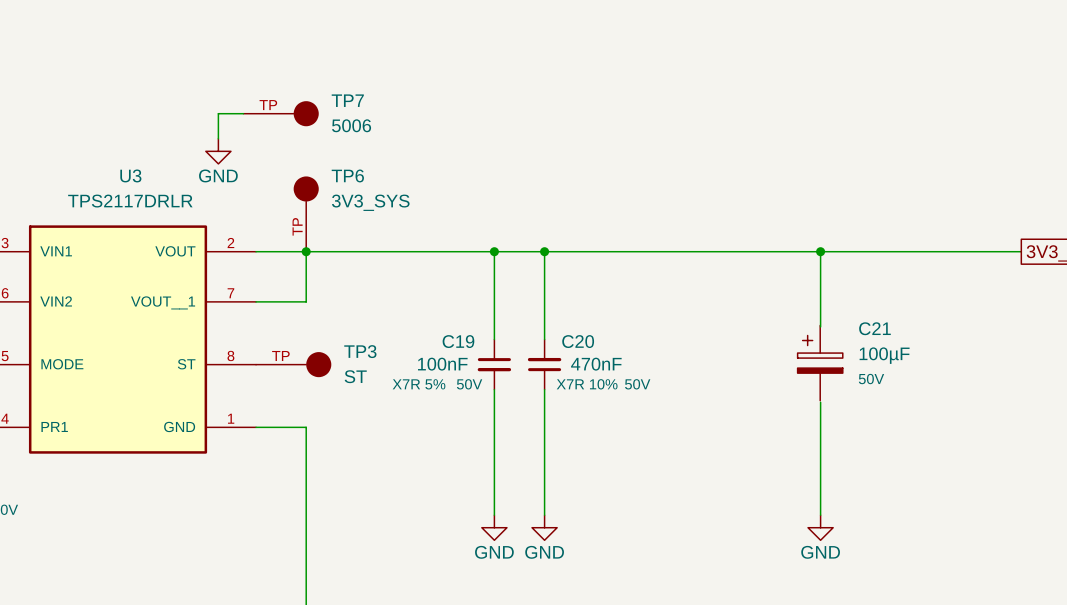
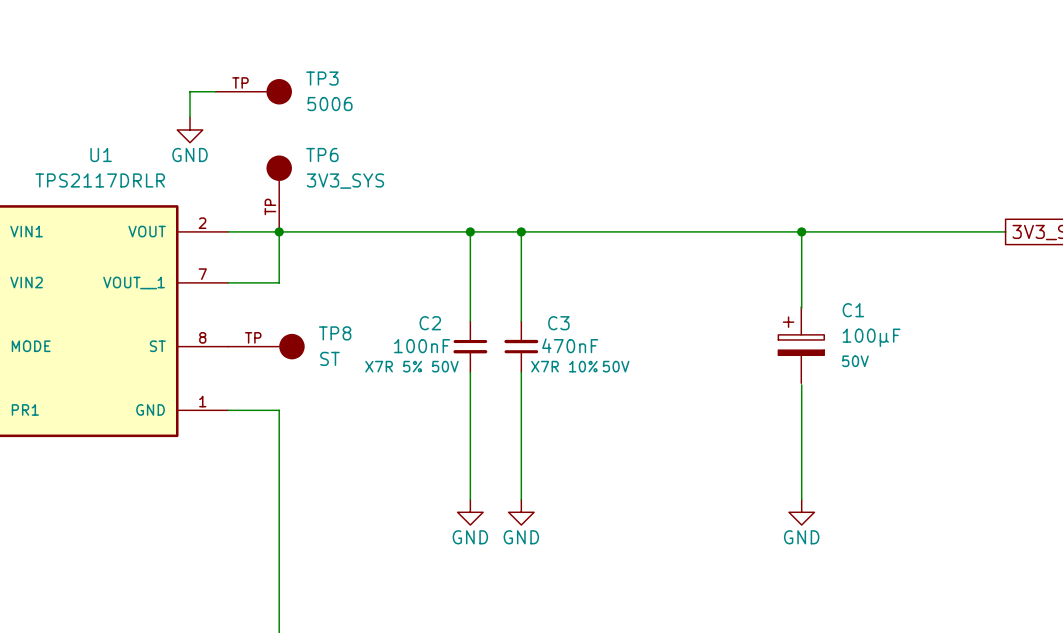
TP7 name: TP7 (347, 100) -> TP3 (322, 78)
U3 name: U3 (130, 175) -> U1 (101, 154)
C21 name: C21 (874, 328) -> C1 (853, 310)
C19 name: C19 (458, 341) -> C2 (430, 323)
C20 name: C20 (578, 341) -> C3 (558, 323)
TP3 name: TP3 (360, 351) -> TP8 (335, 333)

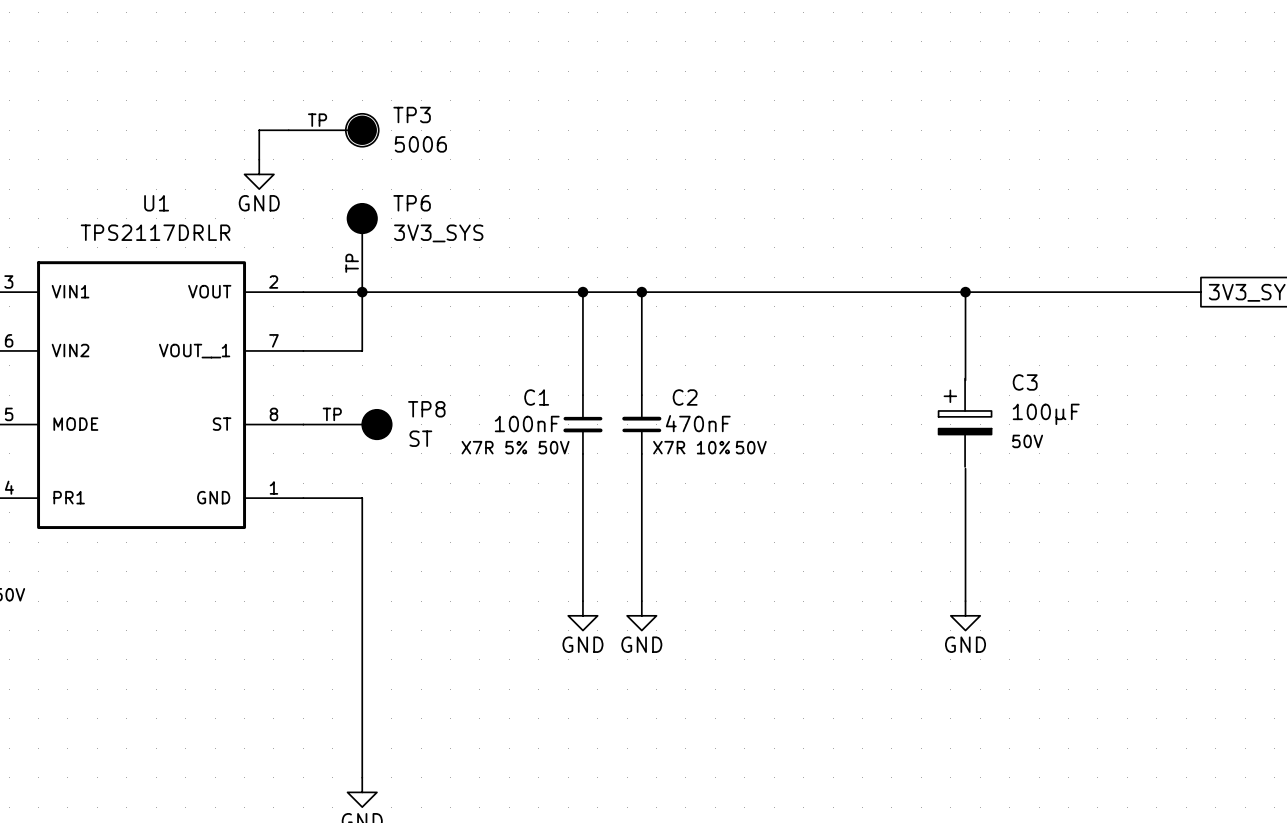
TP3 symbol: [215, 79, 292, 105] -> [288, 113, 379, 147]
TP6 symbol: [266, 155, 292, 232] -> [347, 203, 377, 293]
C1 name: C1 (853, 310) -> C3 (1025, 382)
C2 name: C2 (430, 323) -> C1 (536, 397)
C3 name: C3 (558, 323) -> C2 (685, 397)
TP8 symbol: [228, 333, 305, 360] -> [303, 409, 392, 440]

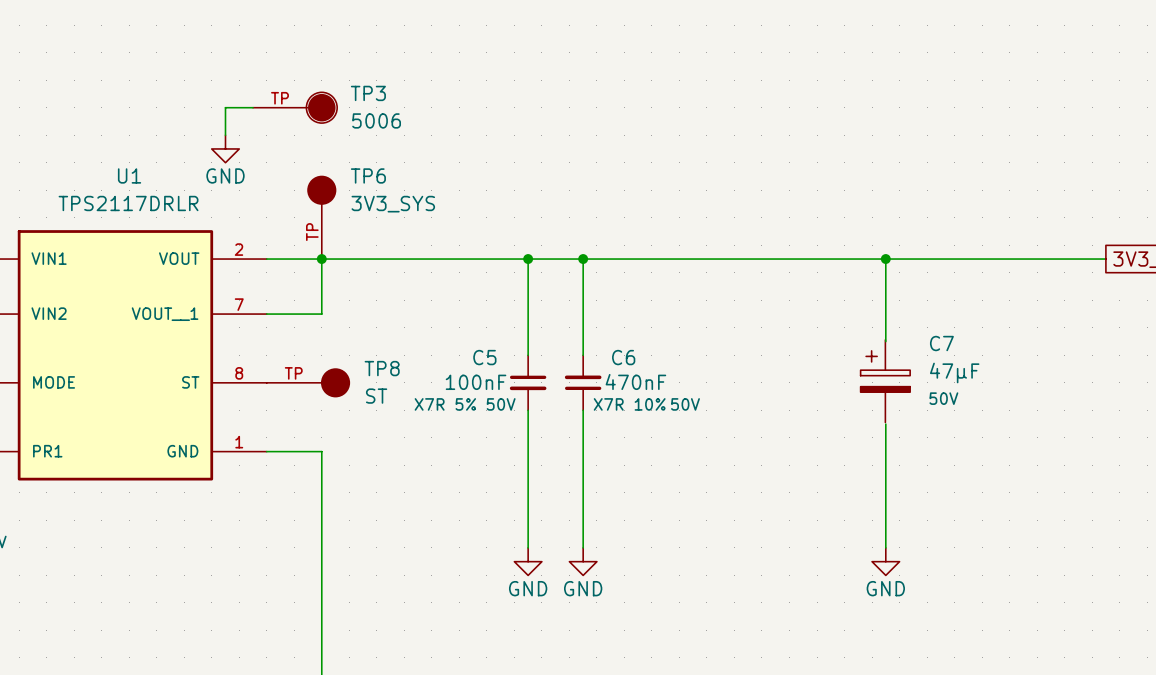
C3 name: C3 (1025, 382) -> C7 (941, 343)
C1 name: C1 (536, 397) -> C5 (484, 357)
C2 name: C2 (685, 397) -> C6 (623, 357)
C3 value: 100µF (1046, 414) -> 47µF (954, 372)

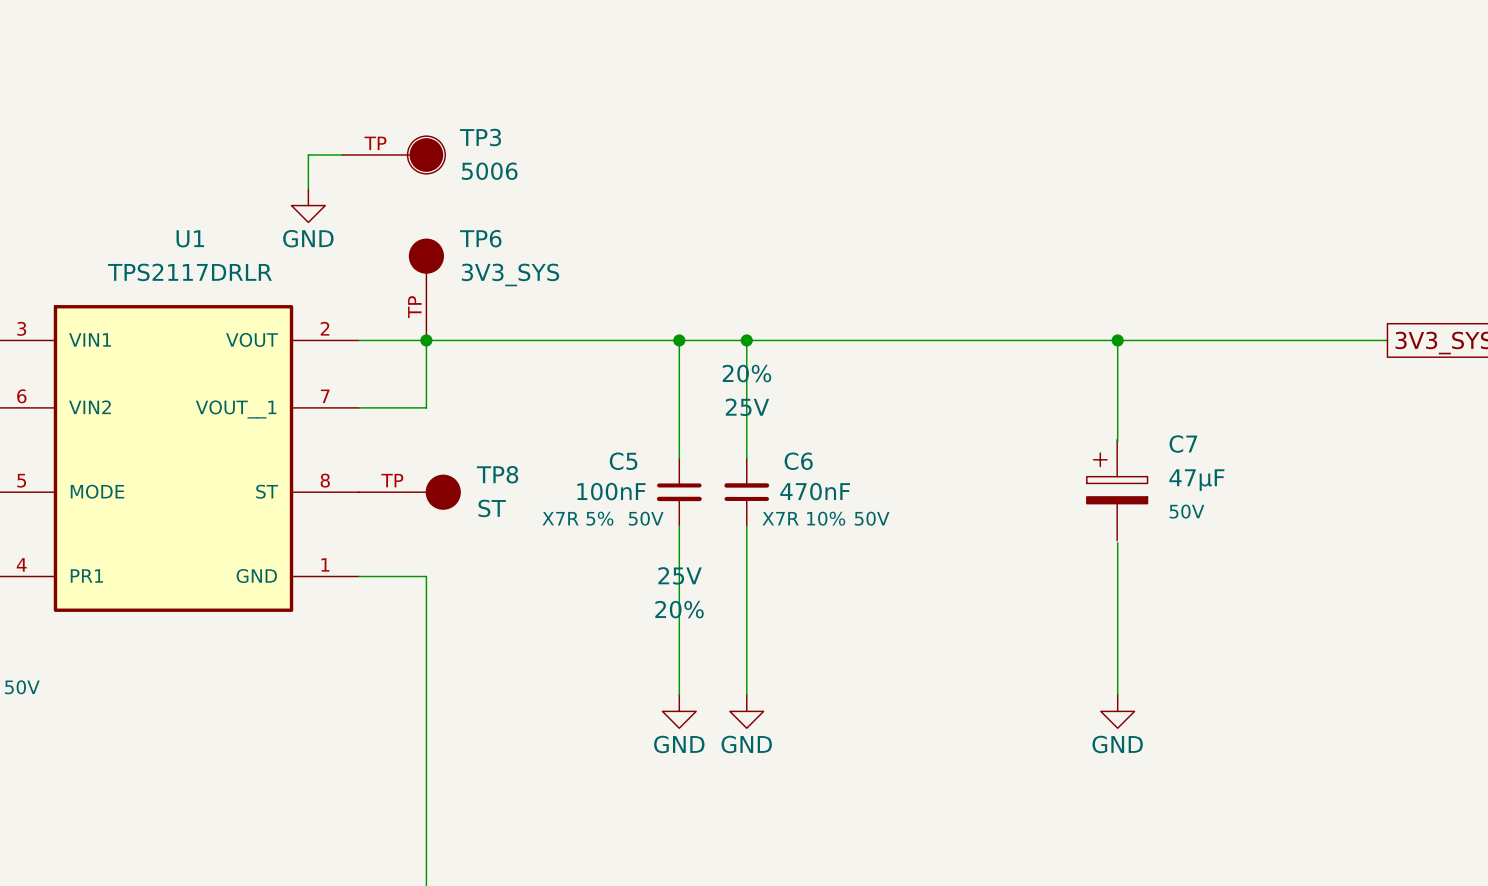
C6 text: none -> 20% (746, 373)
C6 text: none -> 25V (747, 407)
C5 text: none -> 25V (680, 575)
C5 text: none -> 20% (679, 609)

